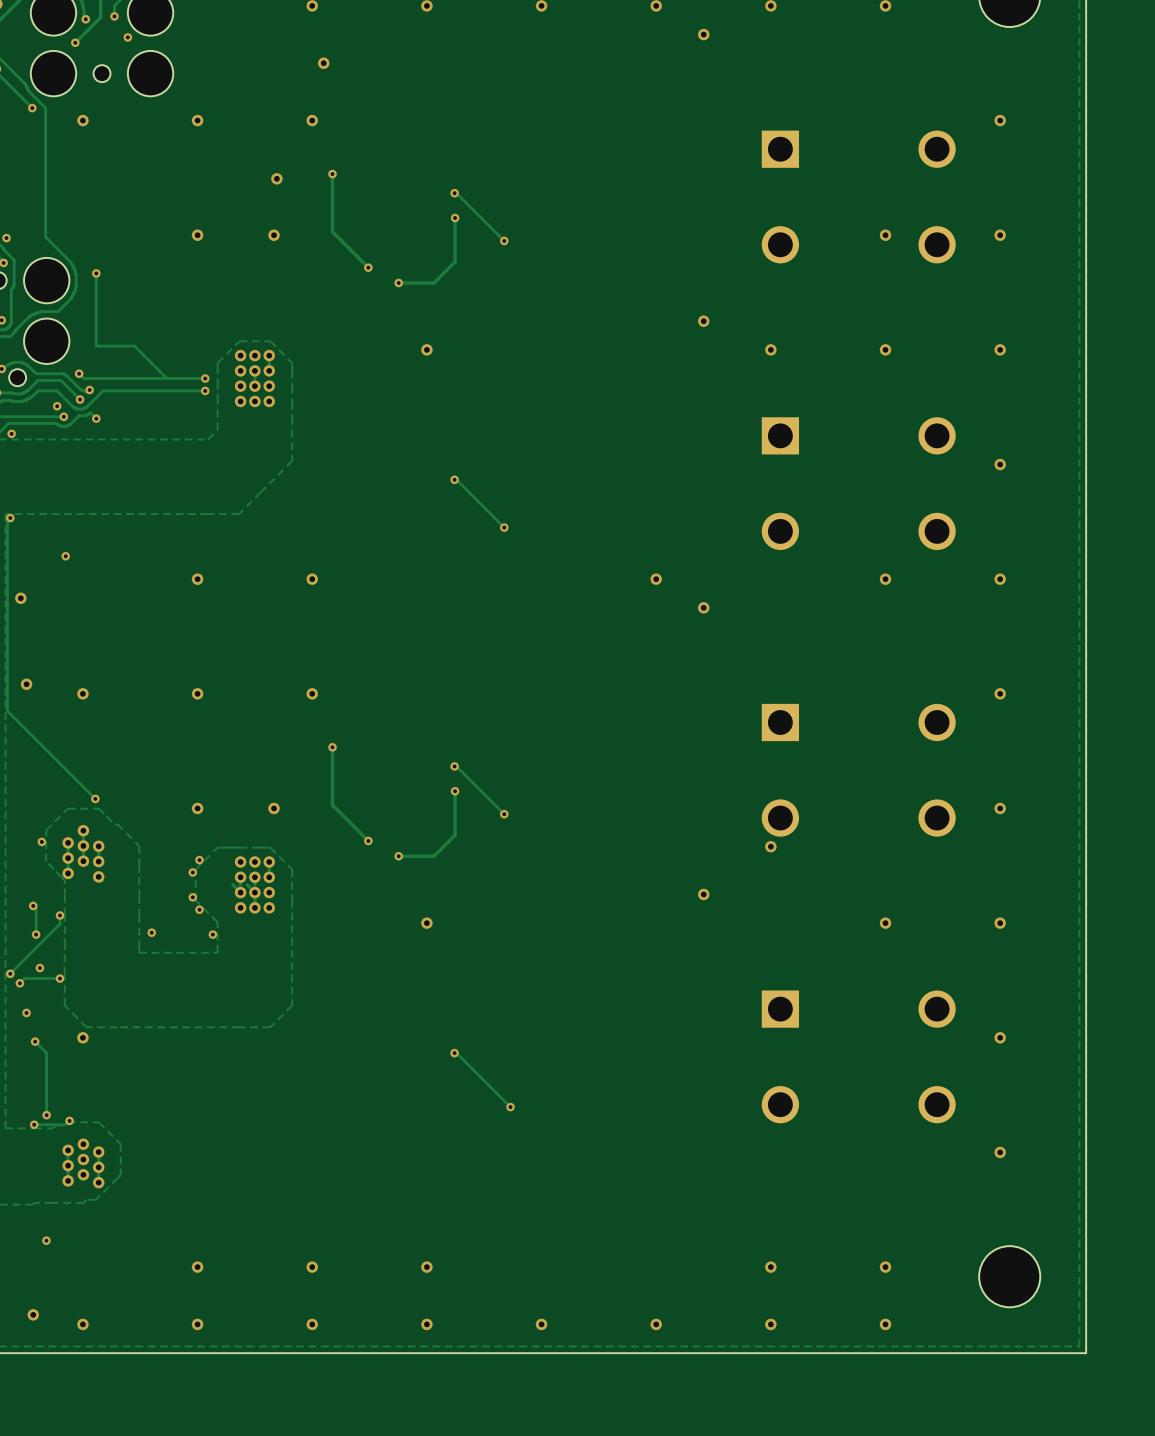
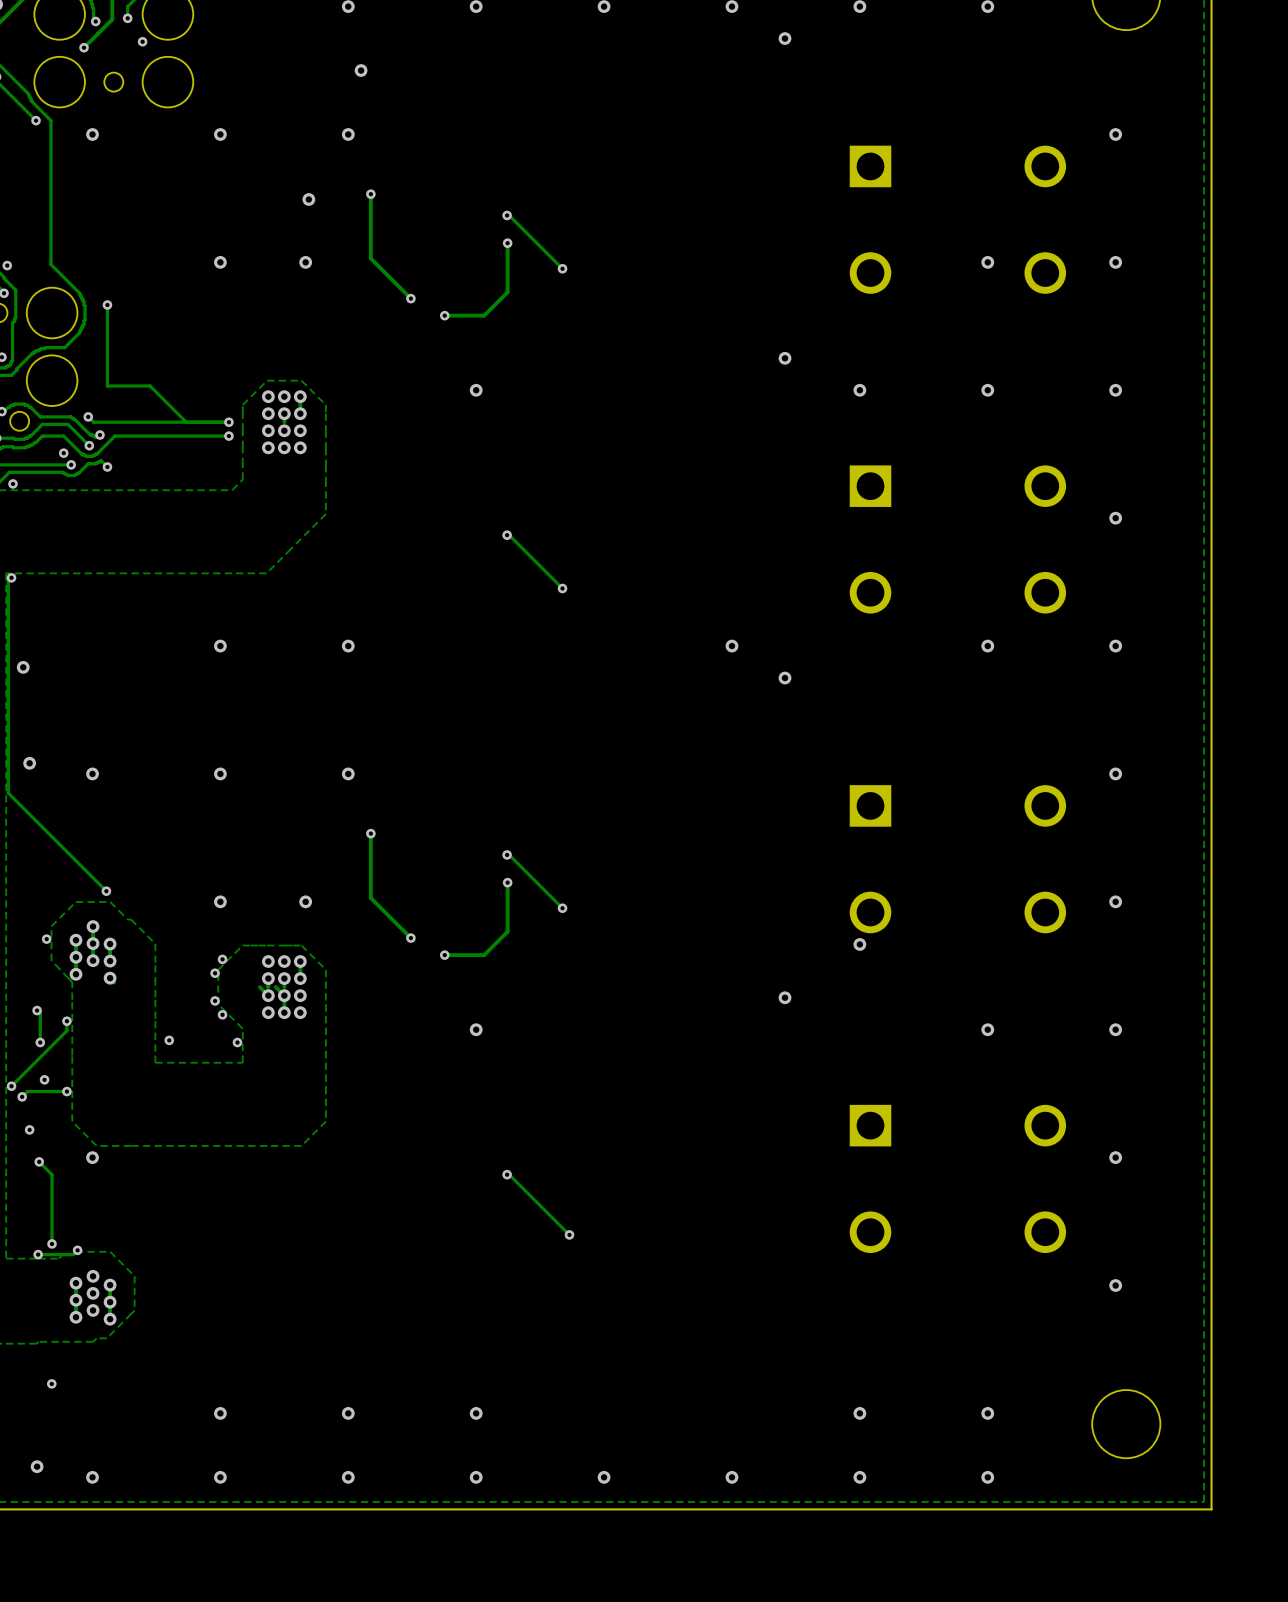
via: (65, 556) -> none

